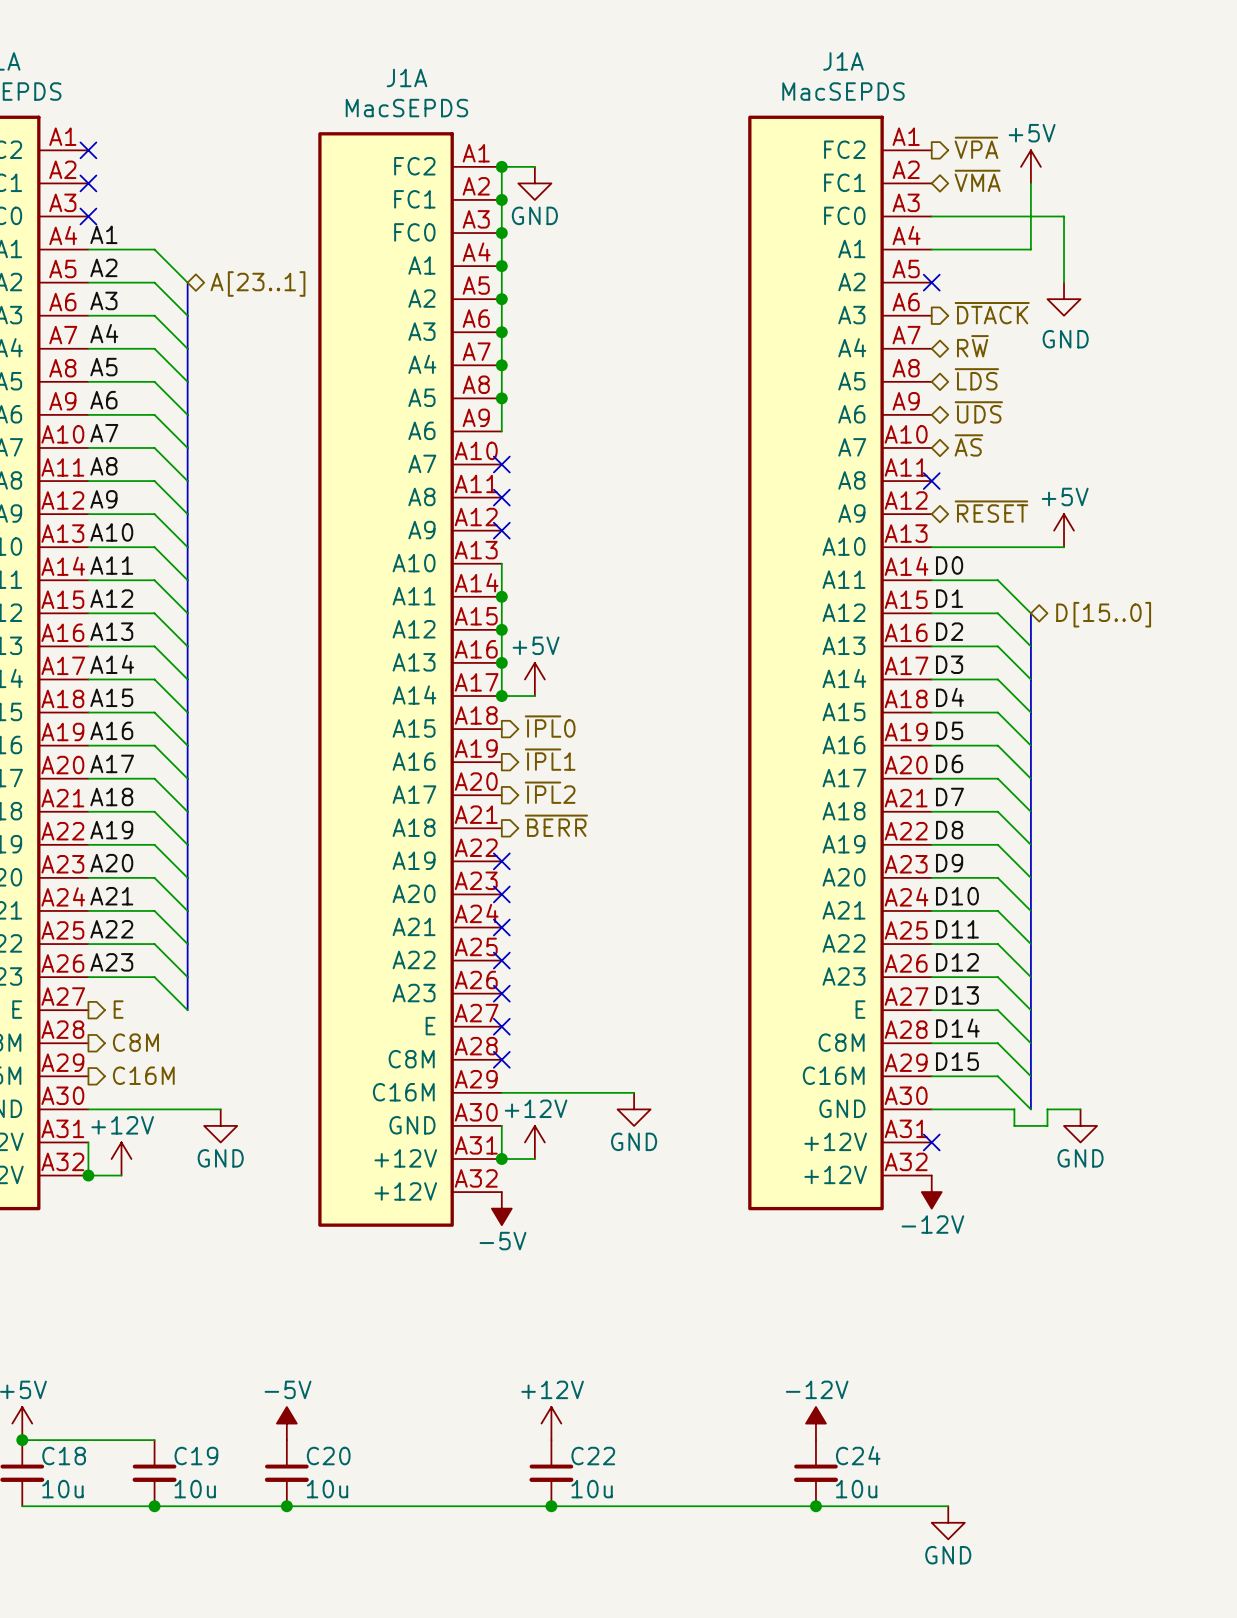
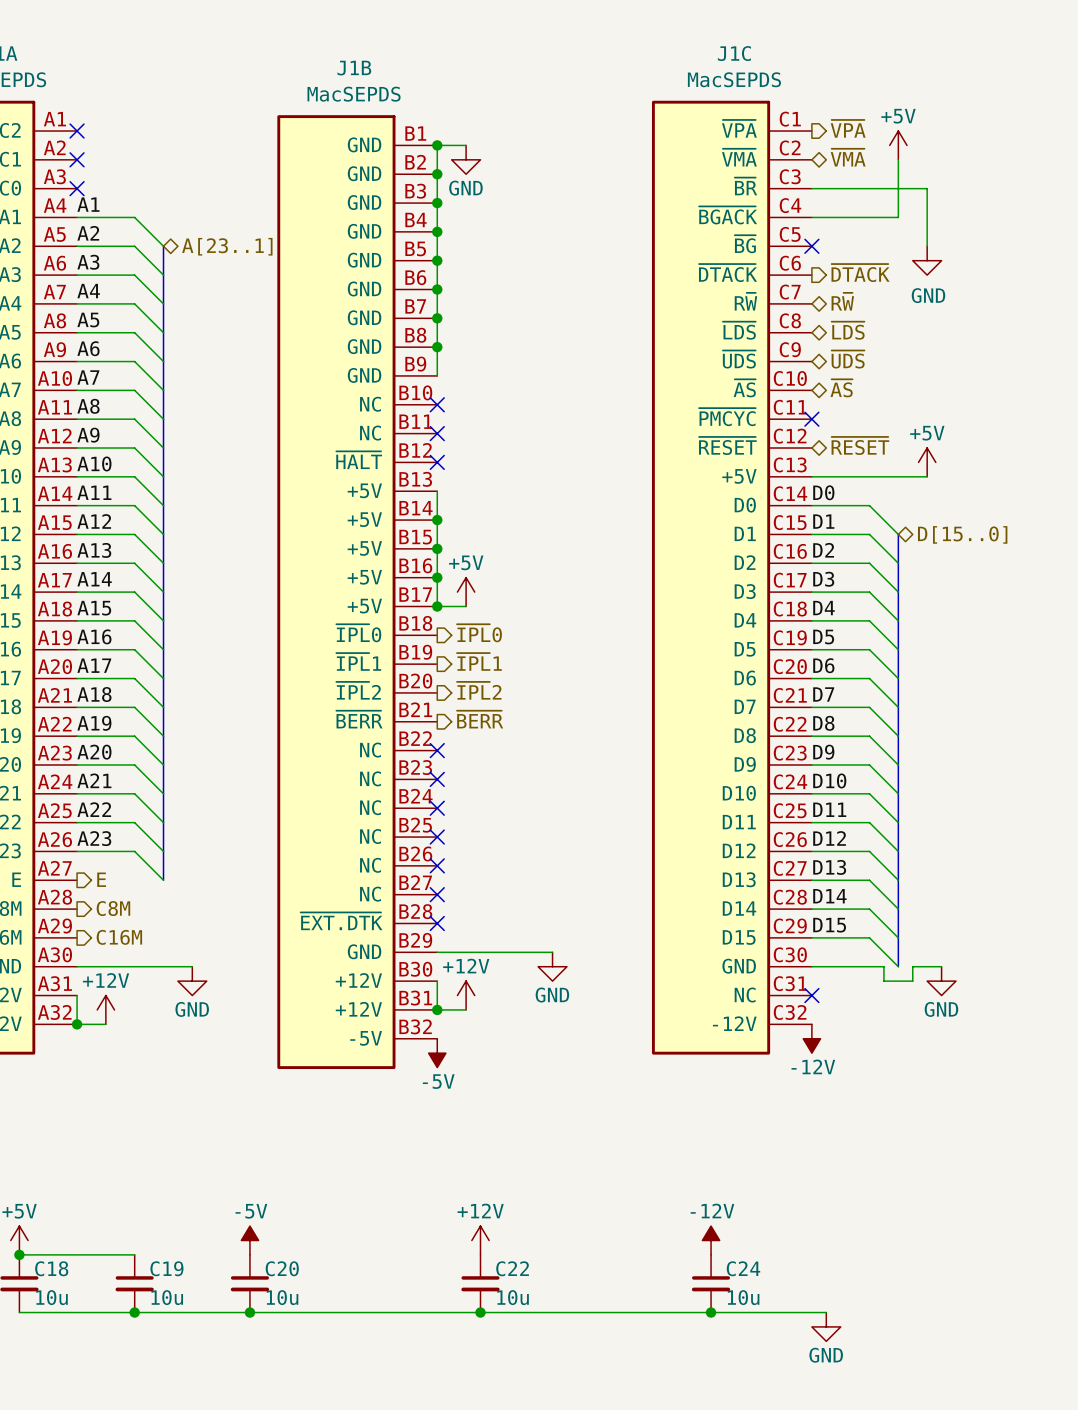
J1A name: J1A (843, 61) -> J1C (734, 53)
J1A name: J1A (406, 77) -> J1B (354, 68)
J1A symbol: [748, 115, 932, 1211] -> [651, 100, 812, 1055]
J1A symbol: [318, 132, 502, 1227] -> [277, 115, 438, 1070]

